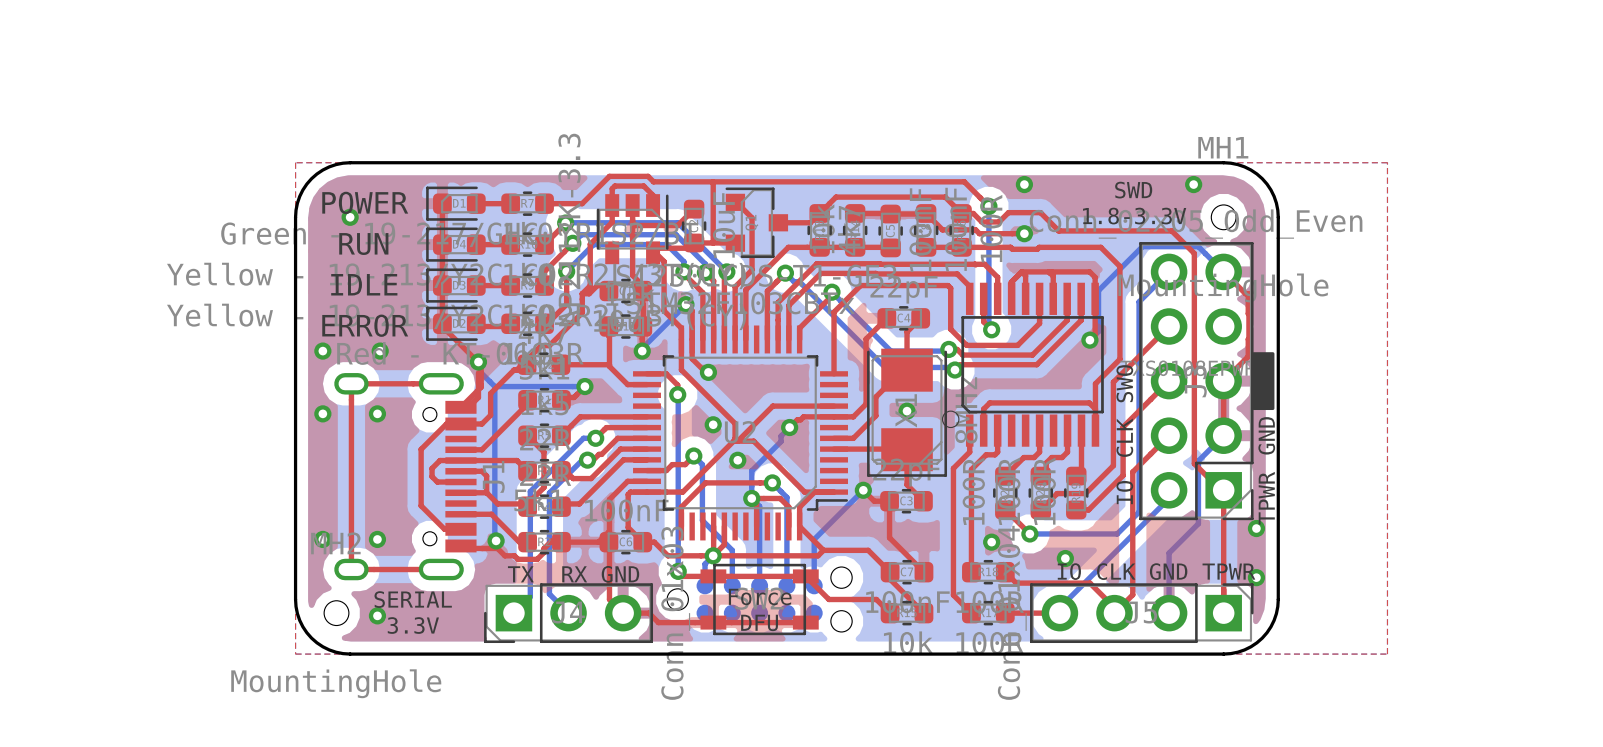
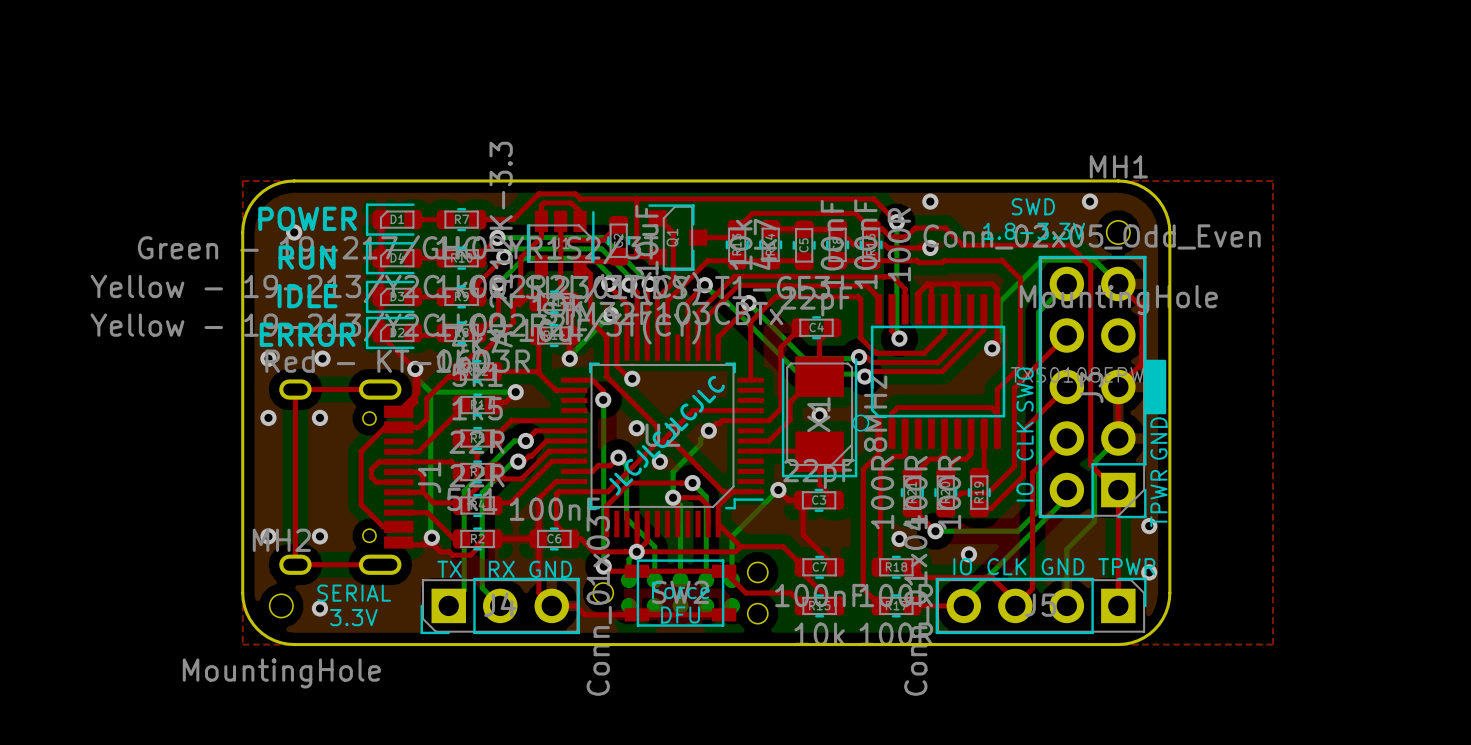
text: none -> JLCJLCJLCJLC (666, 435)

